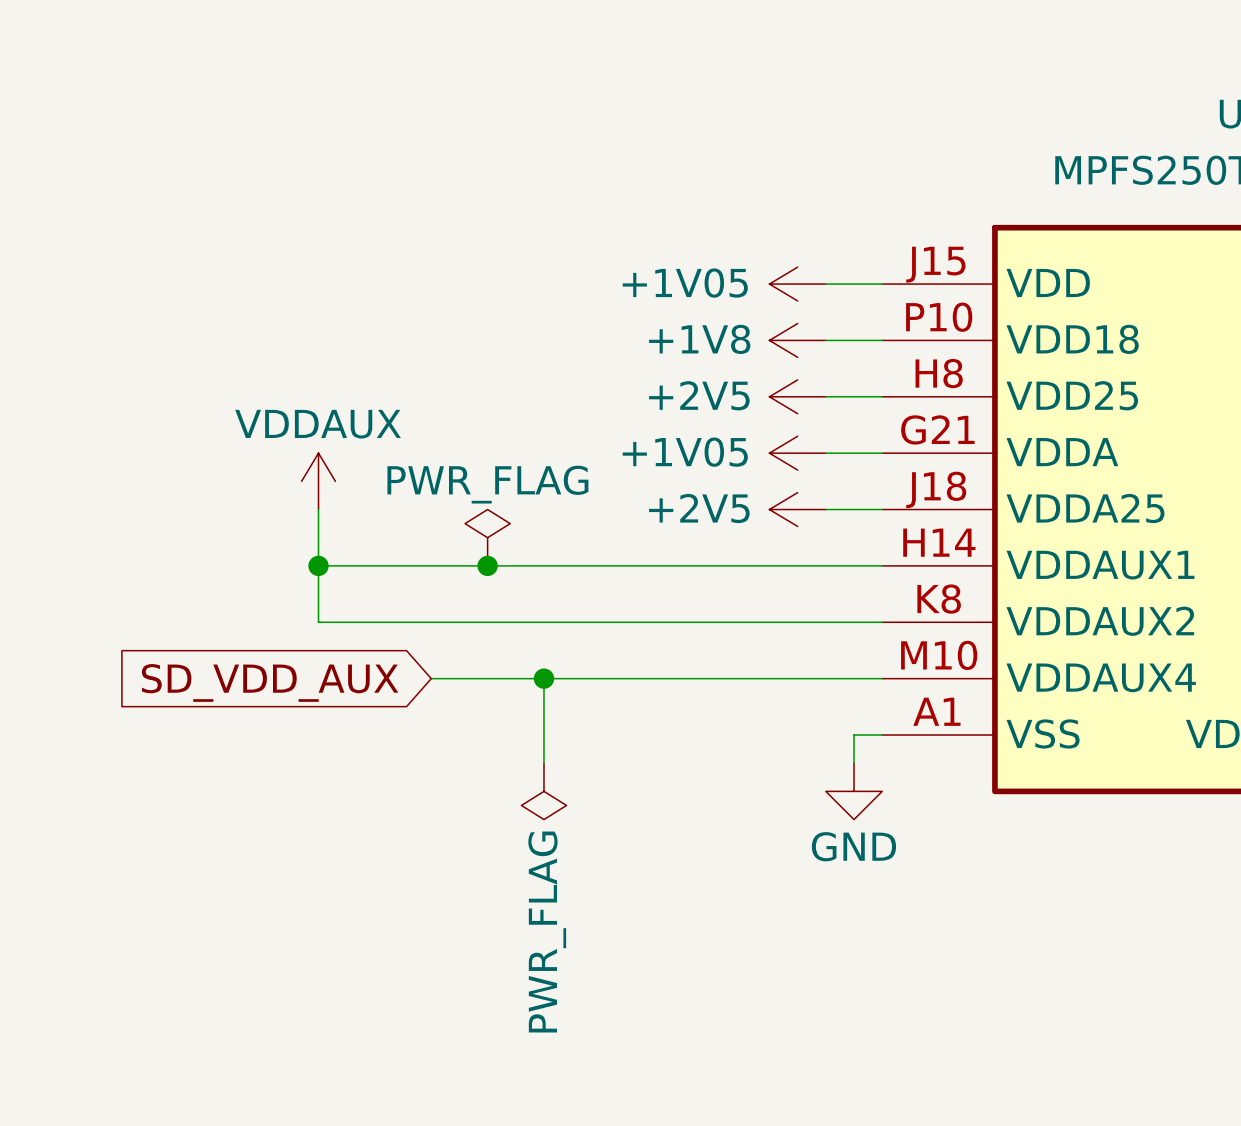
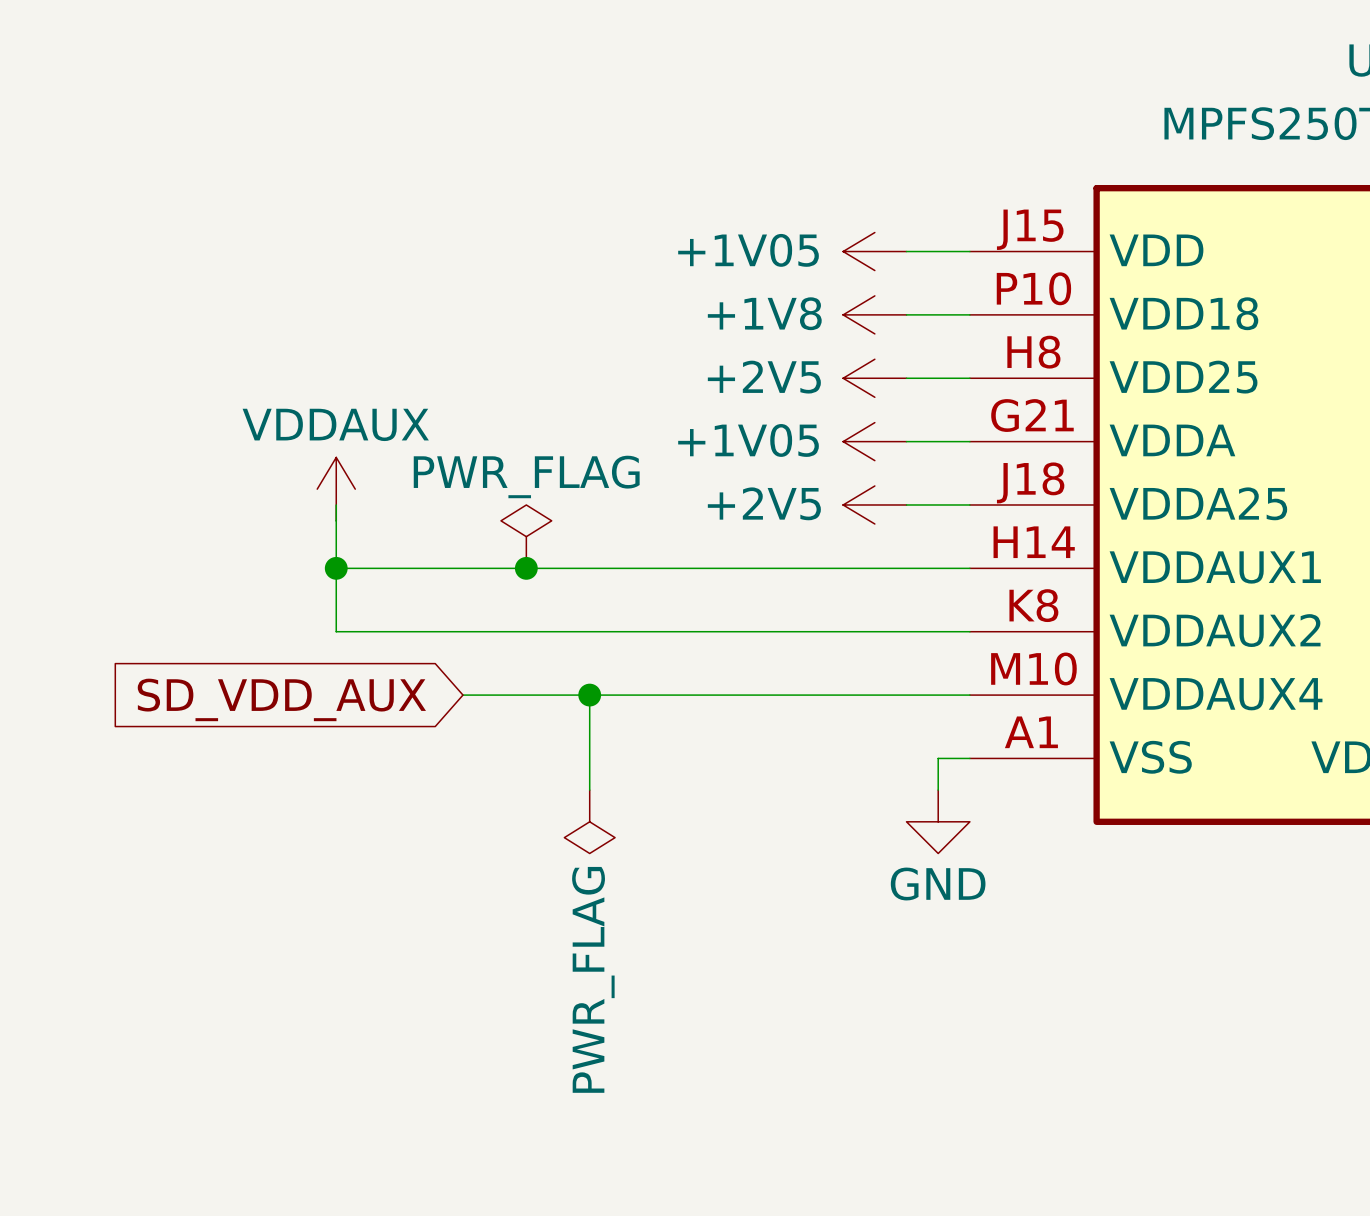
power symbol position: VDDAUX (318, 481) -> VDDAUX (336, 489)

